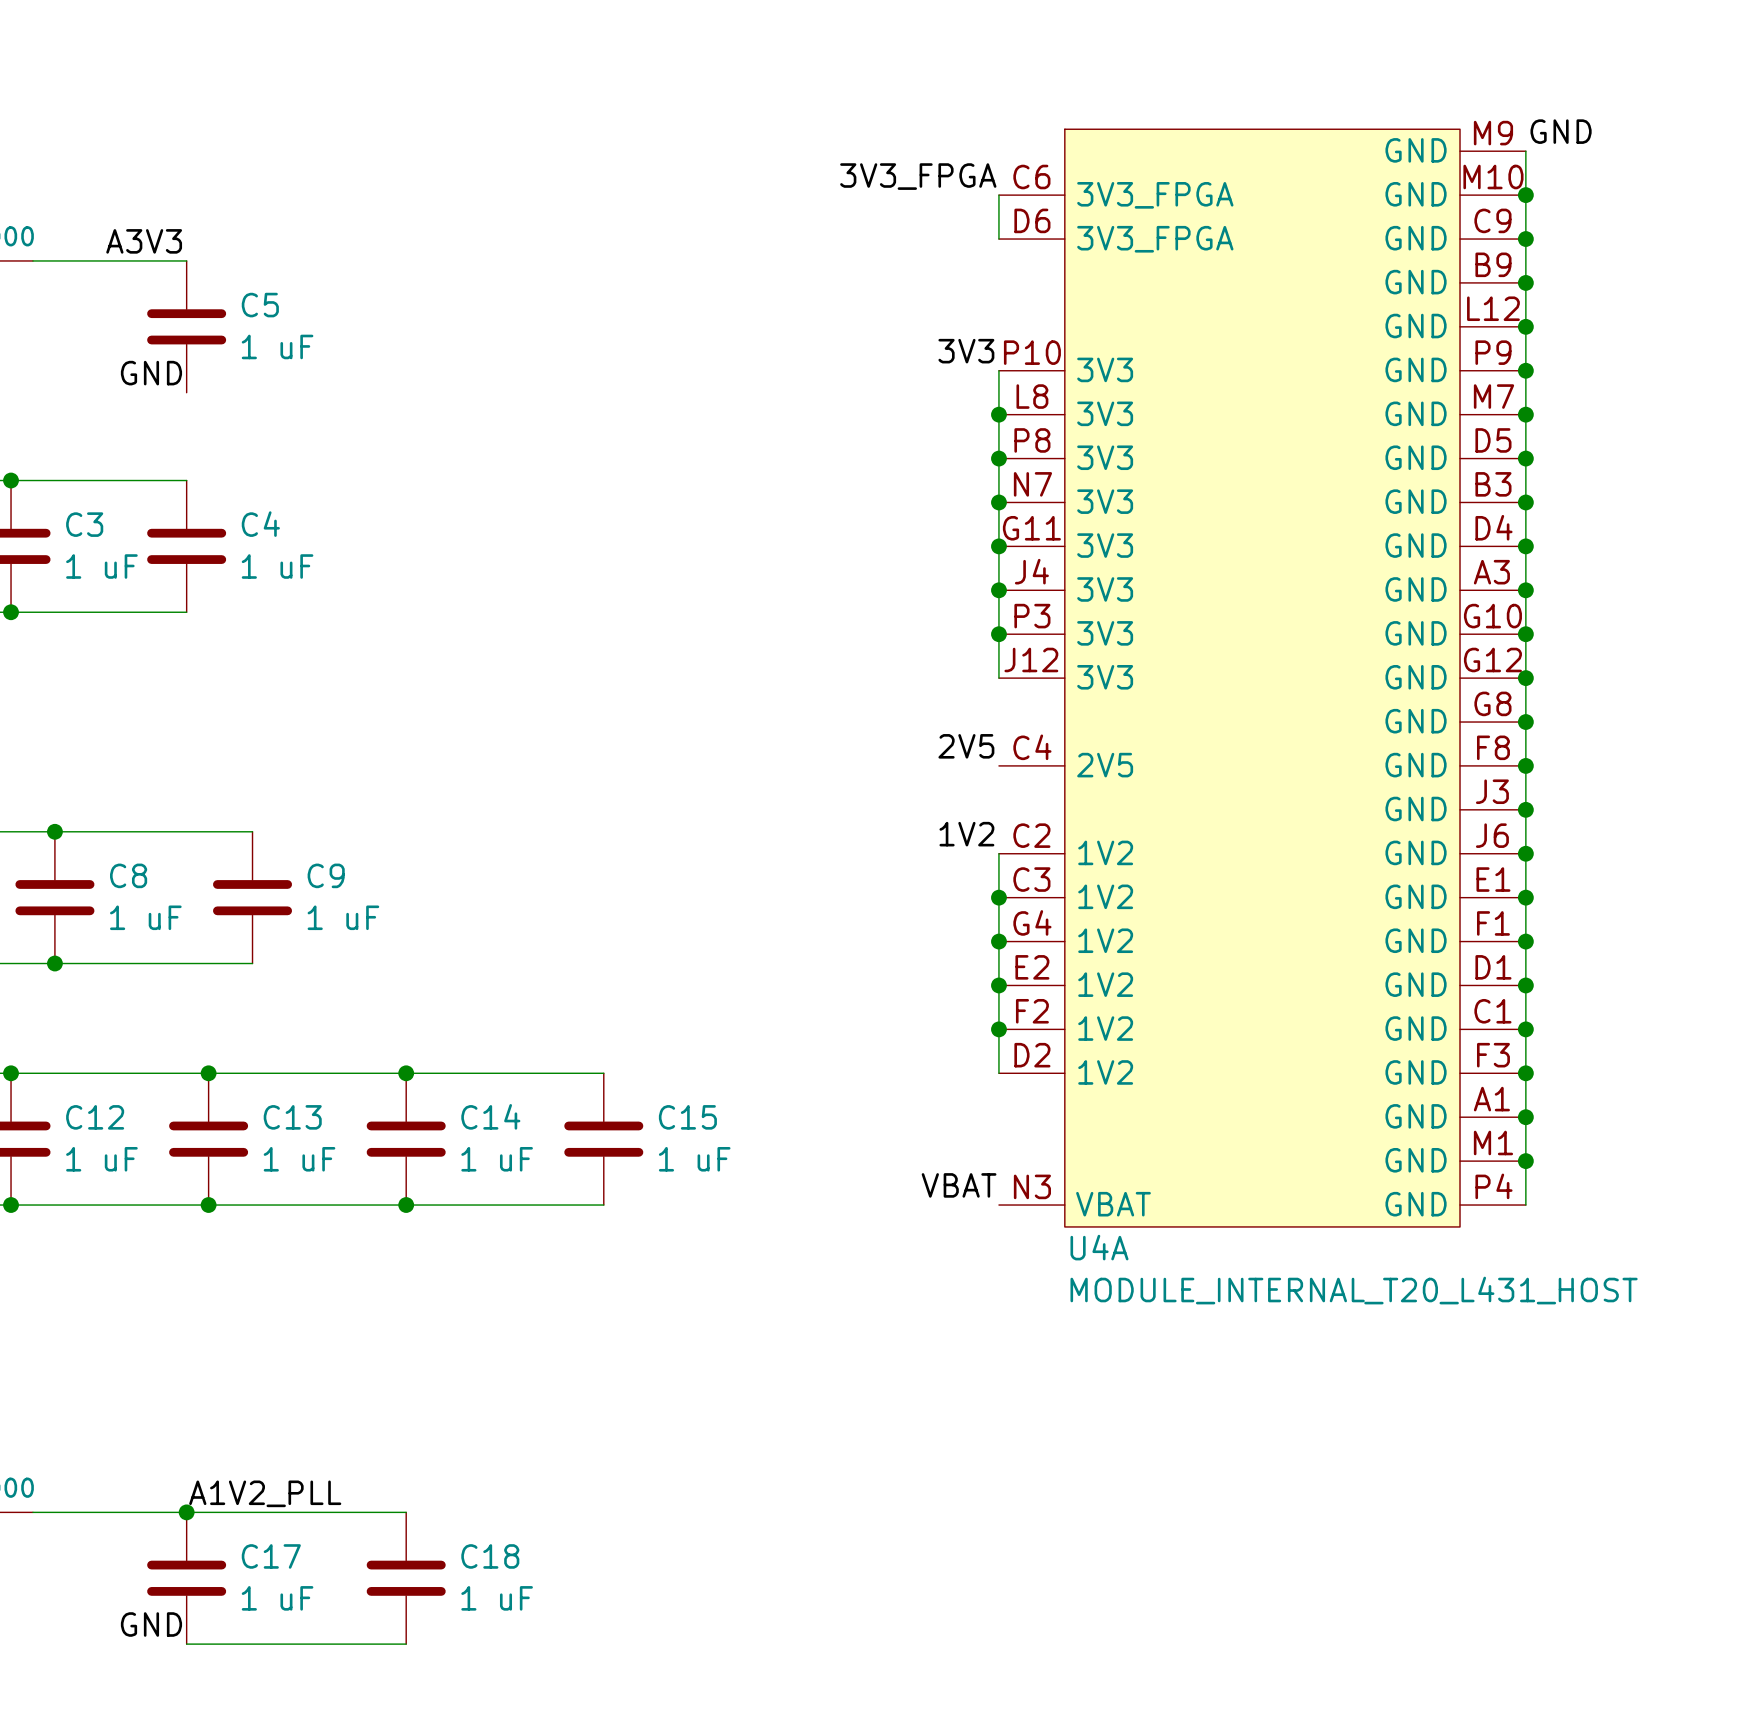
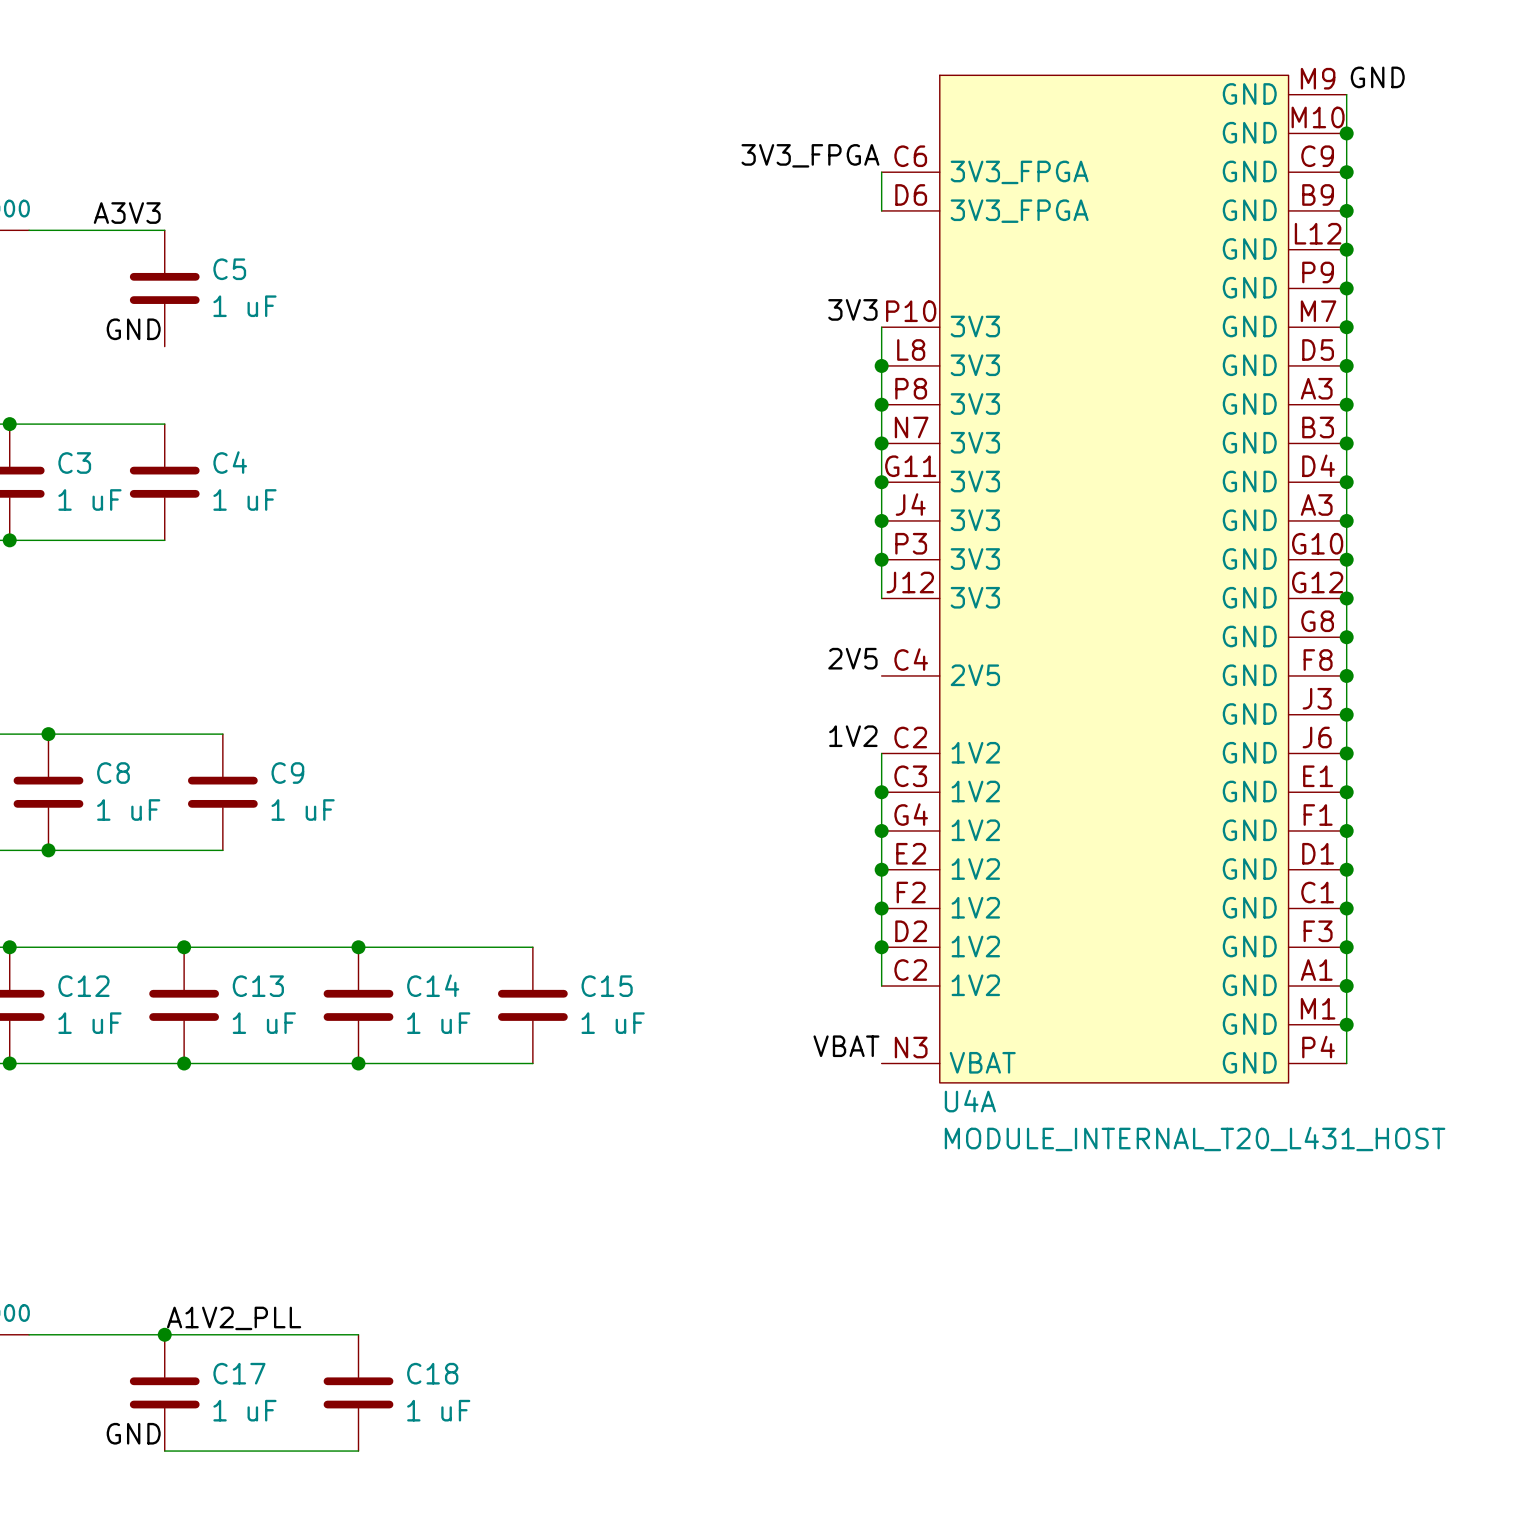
wire: none -> (1346, 94) (1346, 133)
U4A symbol: [998, 129, 1526, 1227] -> [881, 75, 1347, 1083]
label position: GND (1561, 131) -> GND (1377, 77)
junction: none -> (1346, 133)
wire: none -> (881, 947) (881, 986)
junction: none -> (881, 947)

